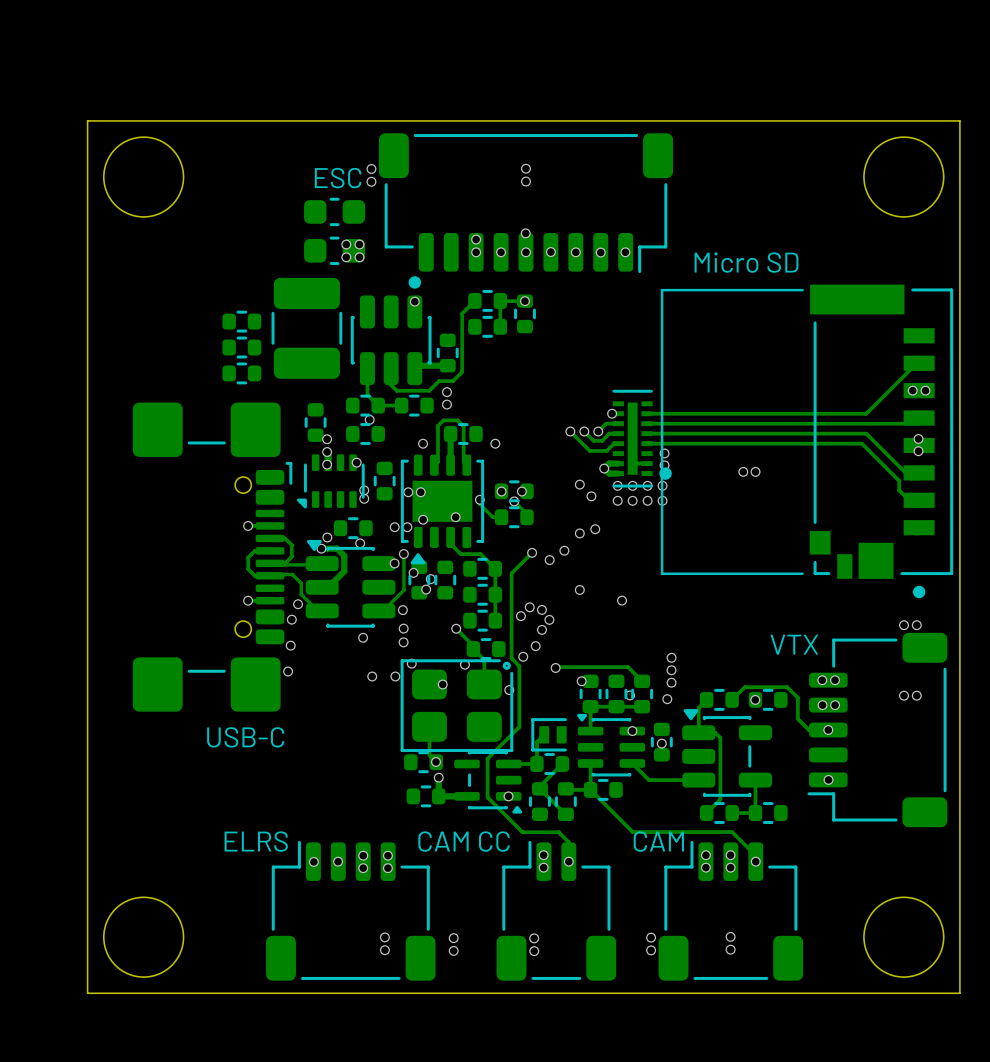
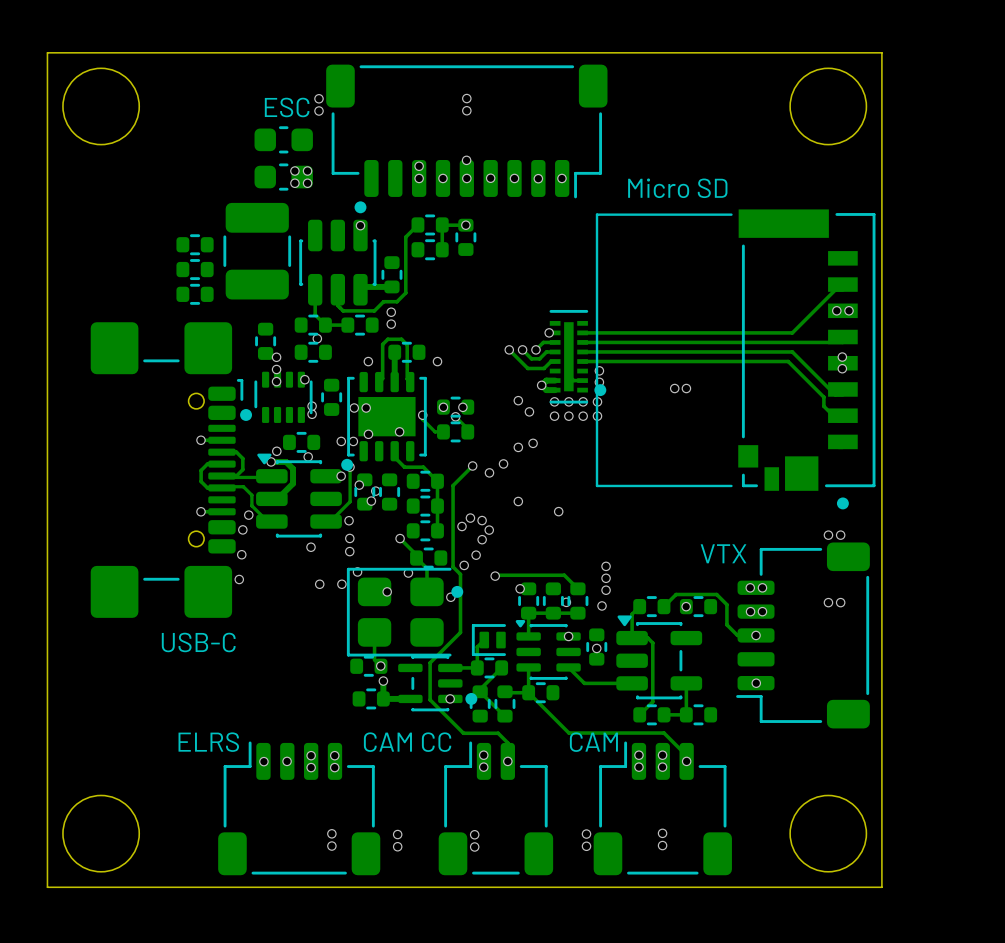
part footprint: [296, 454, 365, 509] -> [240, 371, 313, 423]
part footprint: [400, 454, 485, 565] -> [341, 371, 427, 471]
part footprint: [400, 659, 514, 753] -> [346, 567, 464, 657]
part footprint: [454, 751, 523, 814] -> [398, 655, 478, 712]

